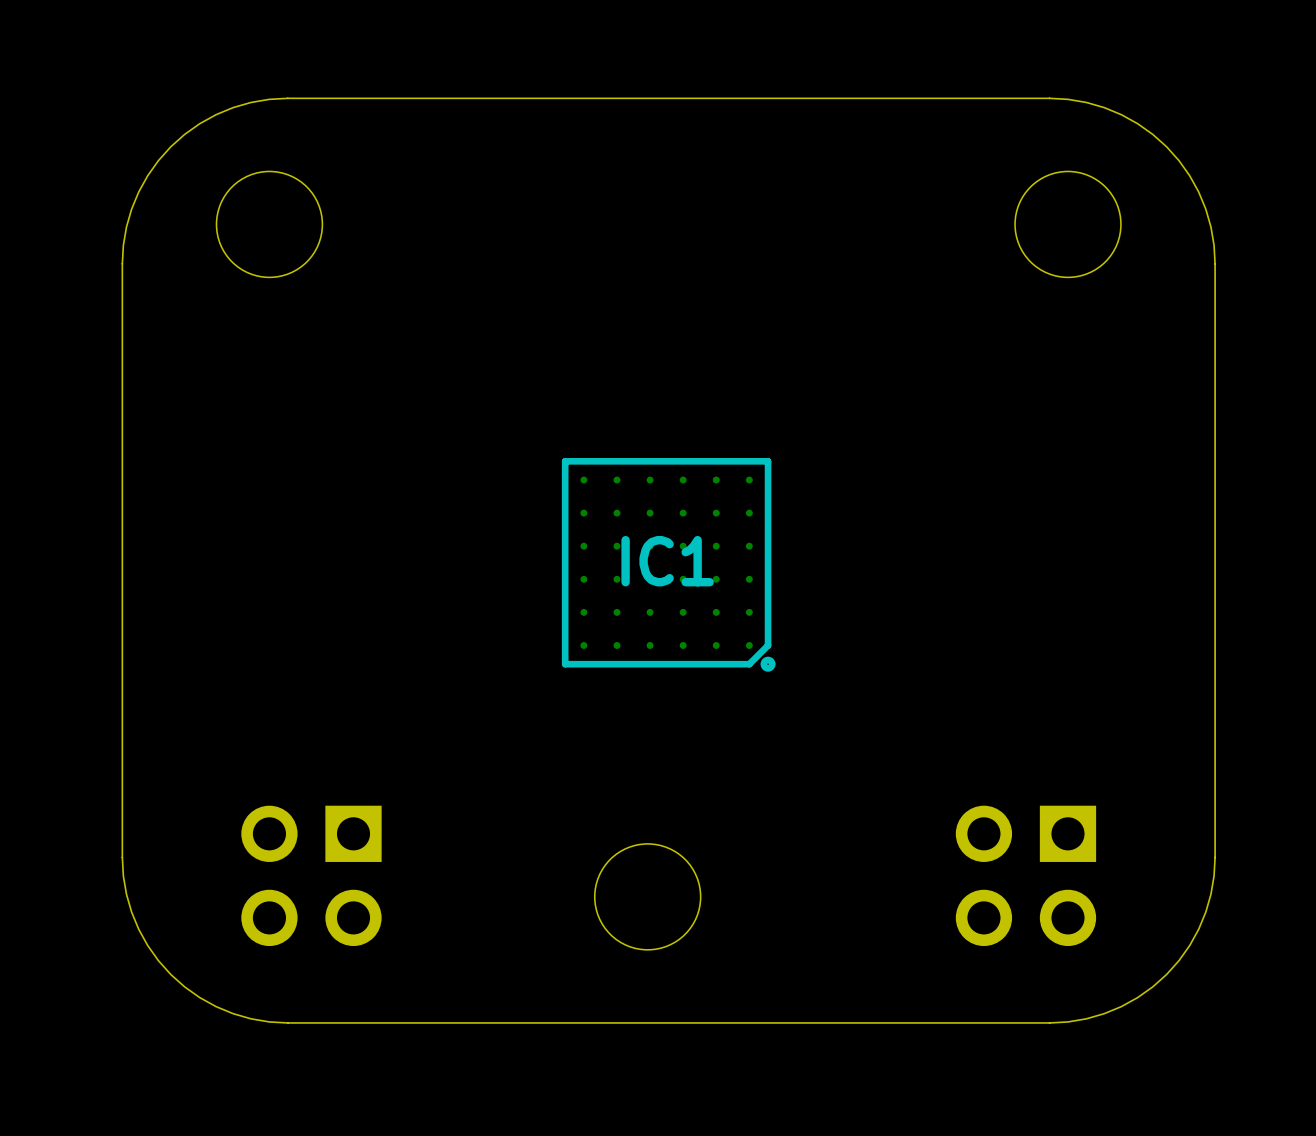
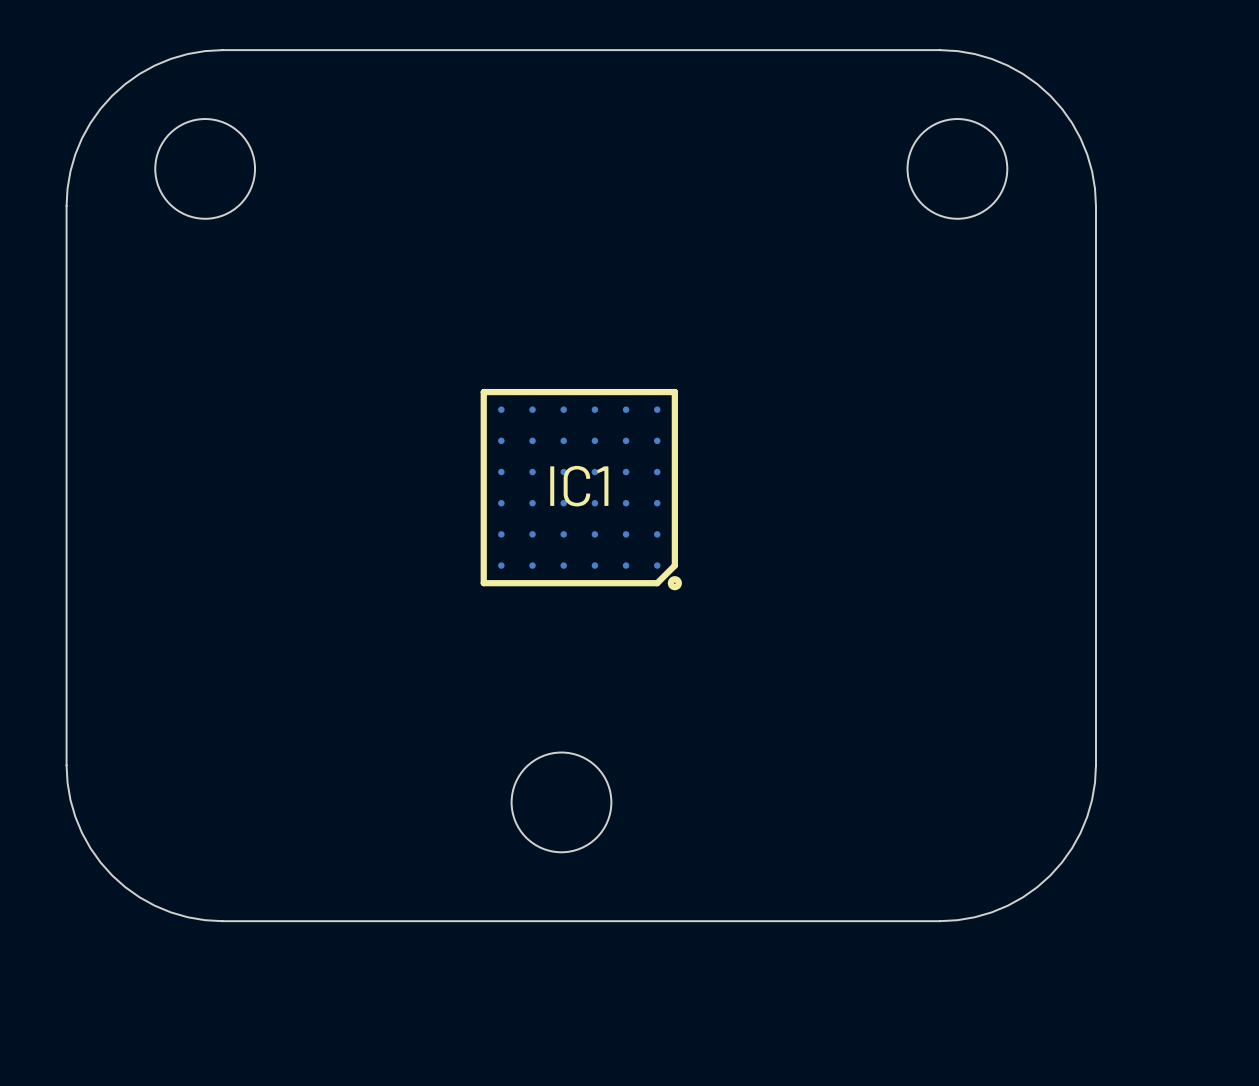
part: (311, 875) -> none
part: (1025, 875) -> none

